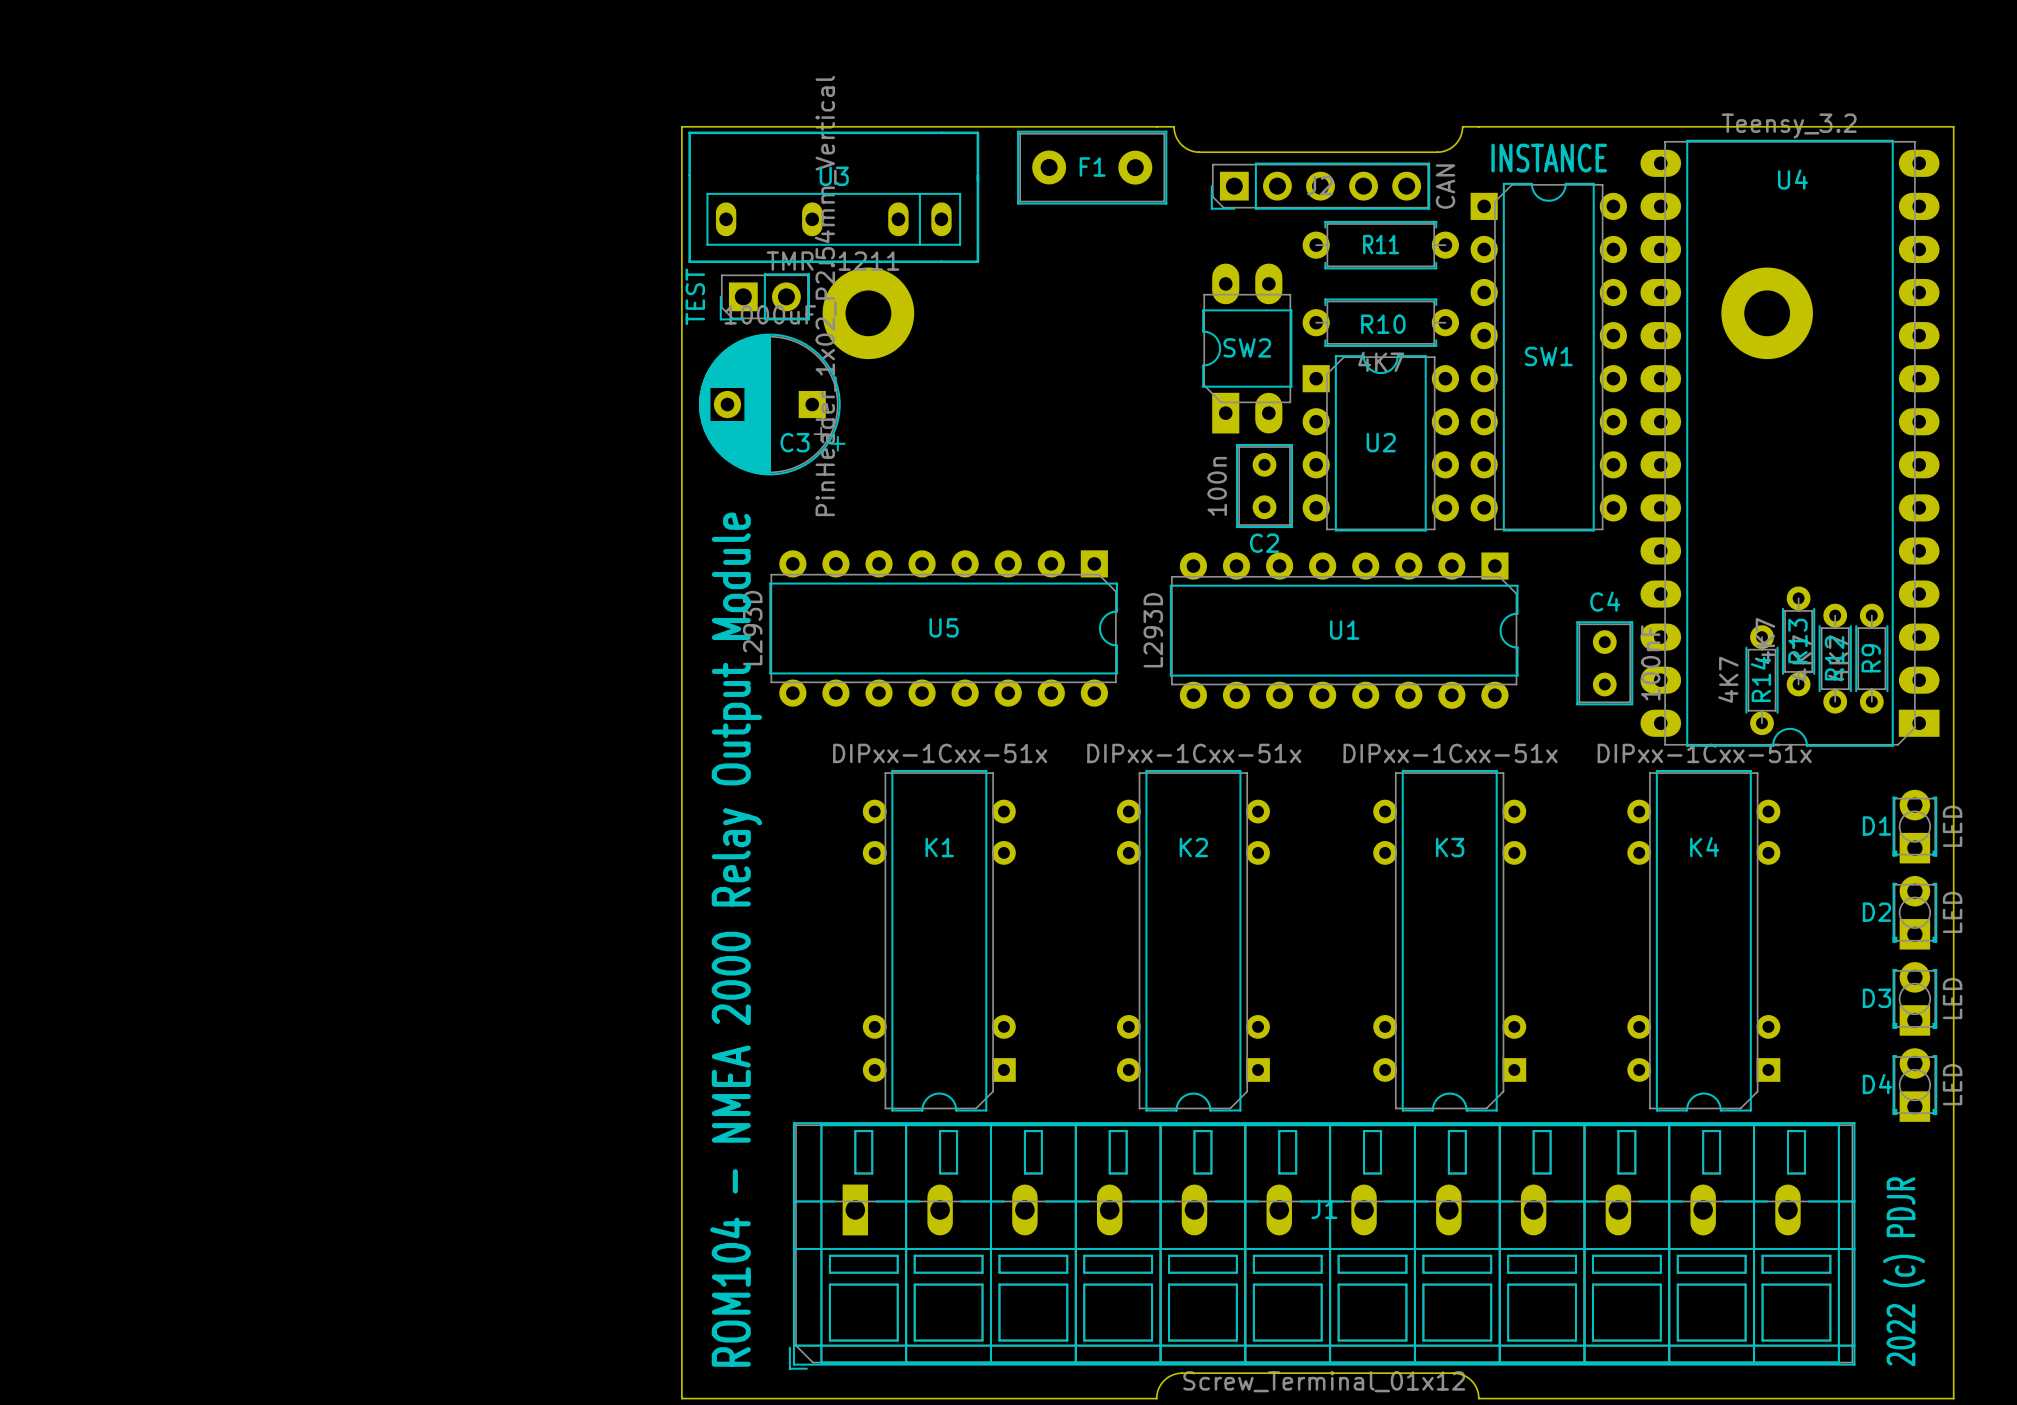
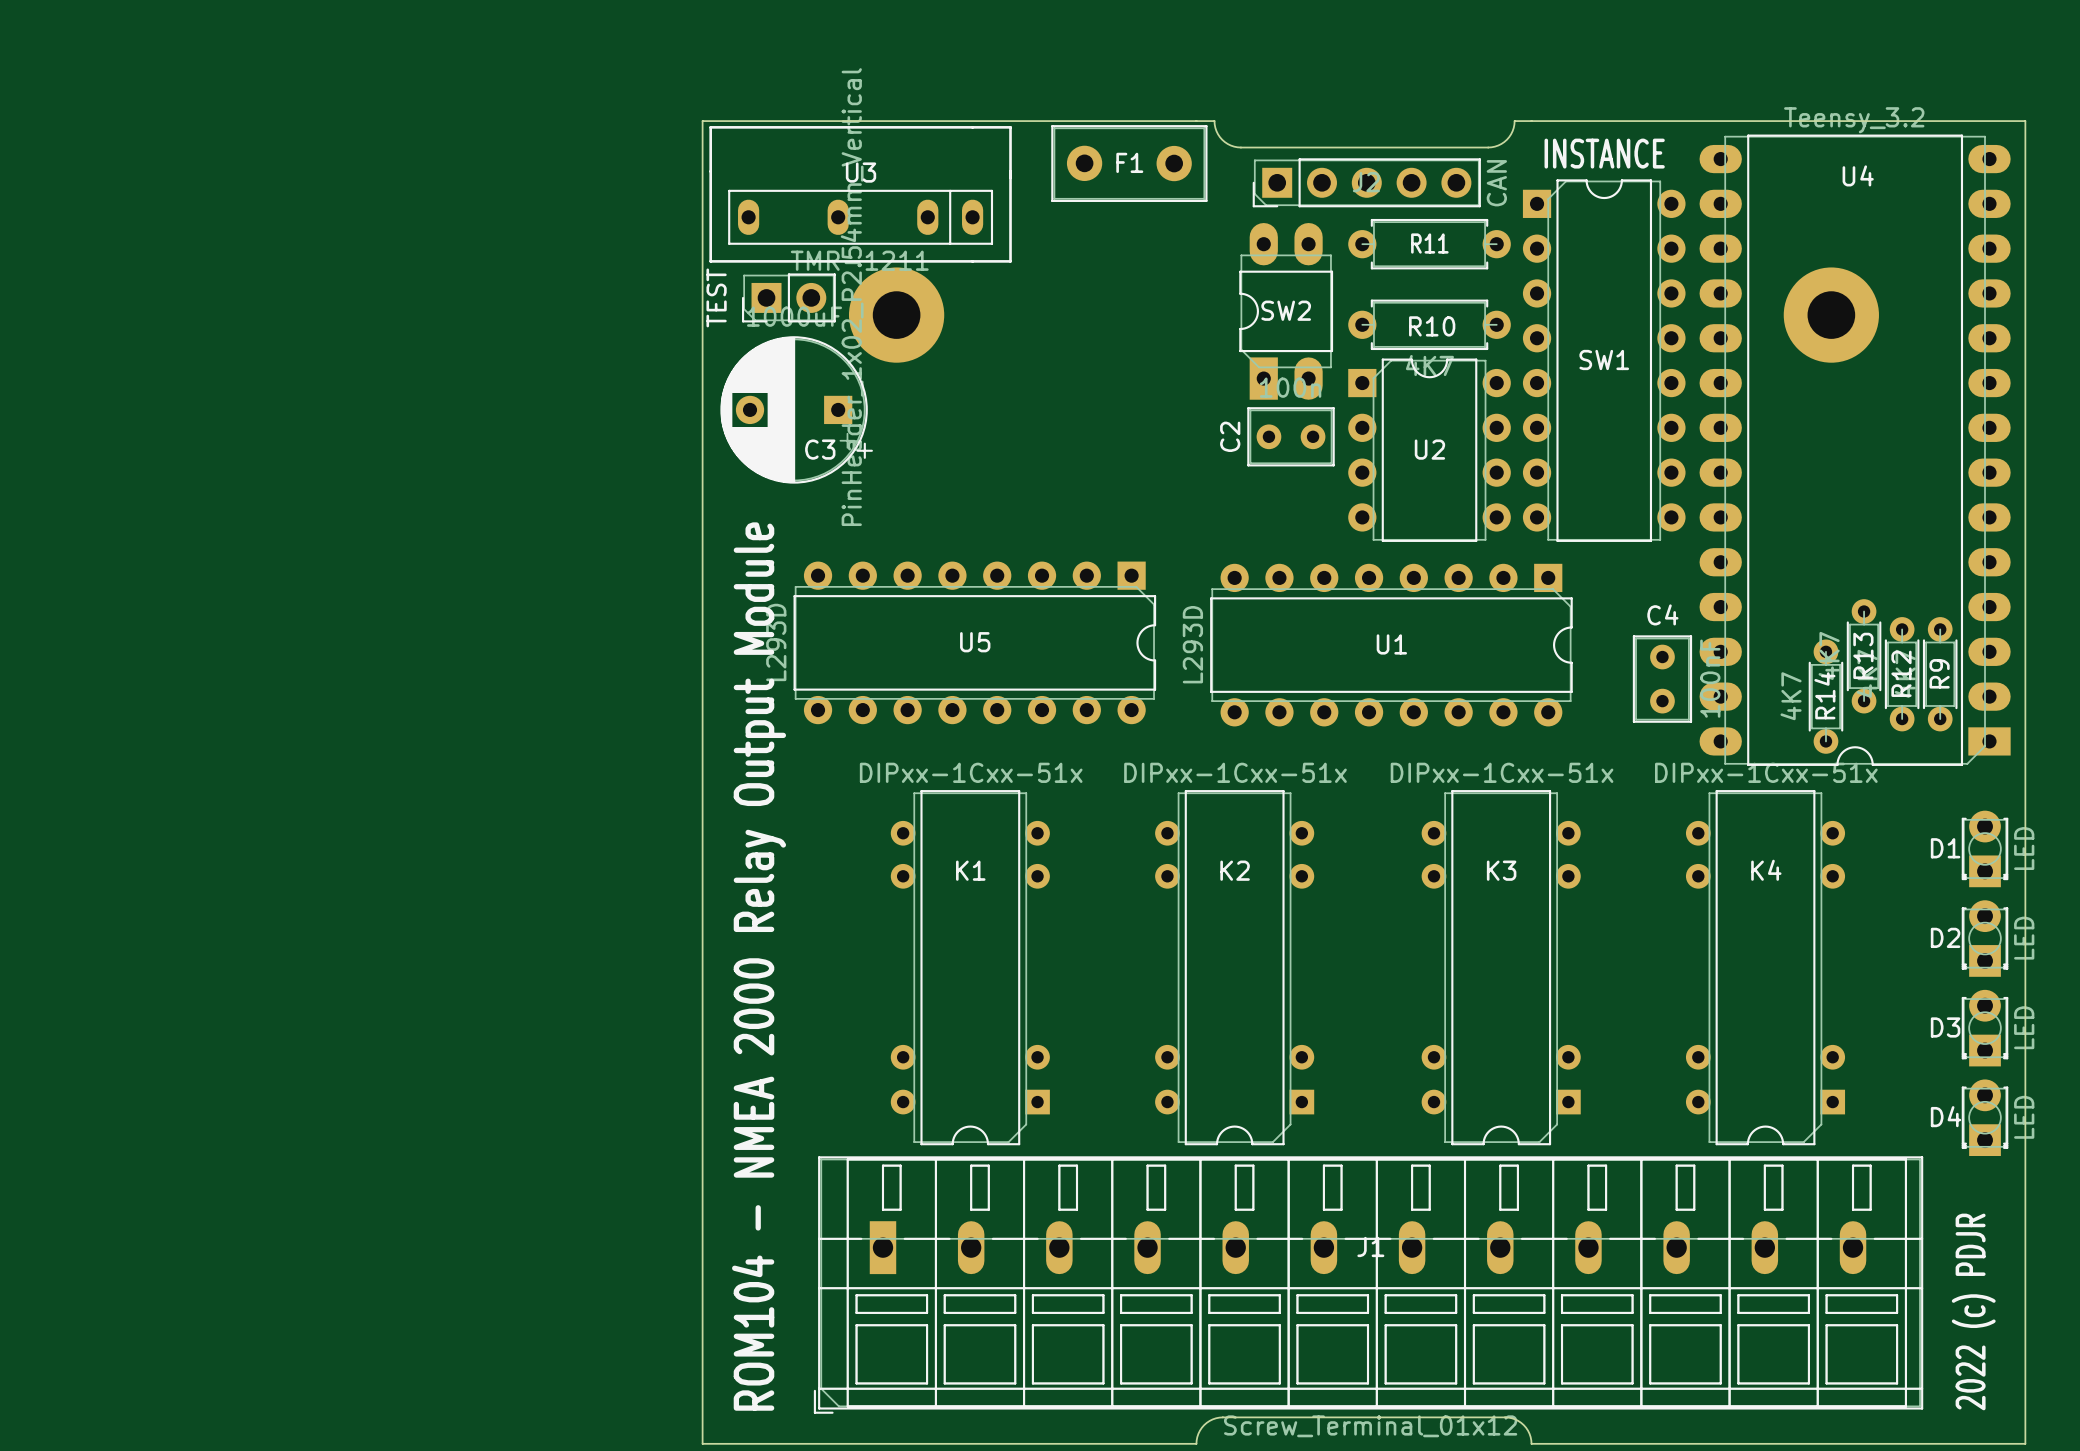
SW2 position: (1247, 348) -> (1286, 311)
C2 rotation: 0° (1264, 486) -> 90° clockwise (1291, 436)
C2 position: (1264, 486) -> (1291, 436)

